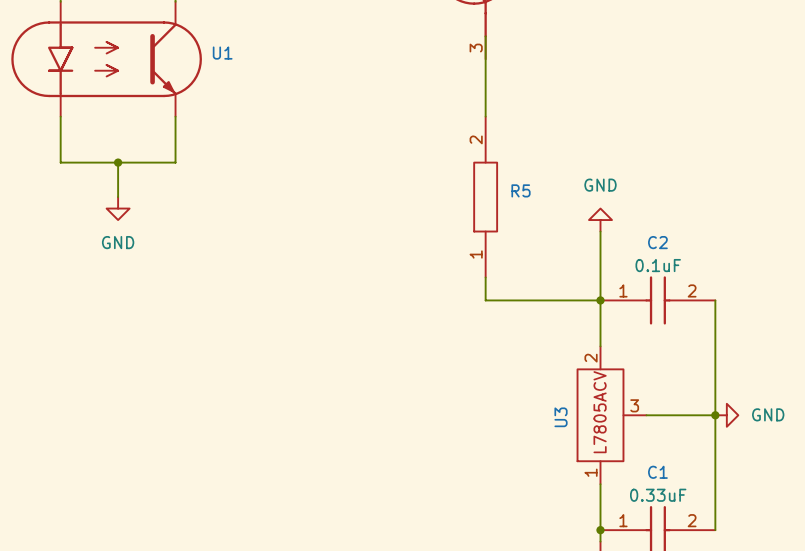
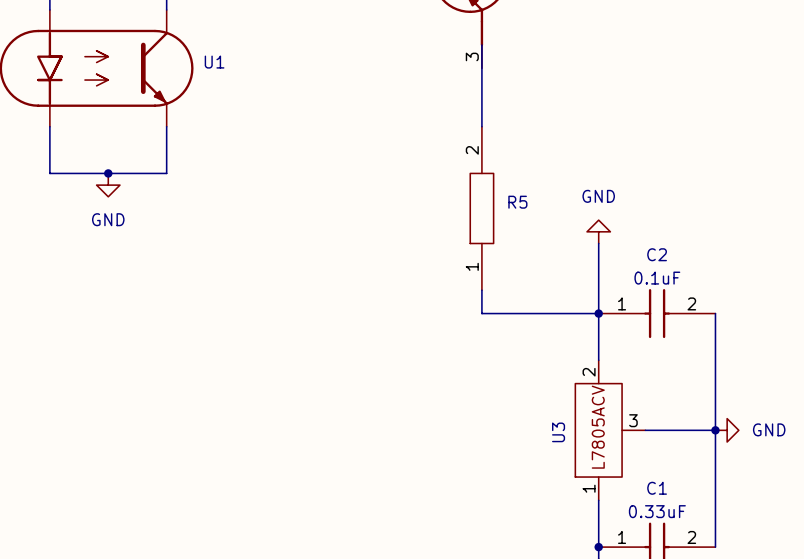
wire: (118, 162) (118, 197) -> none
power symbol position: GND (118, 208) -> GND (108, 185)

